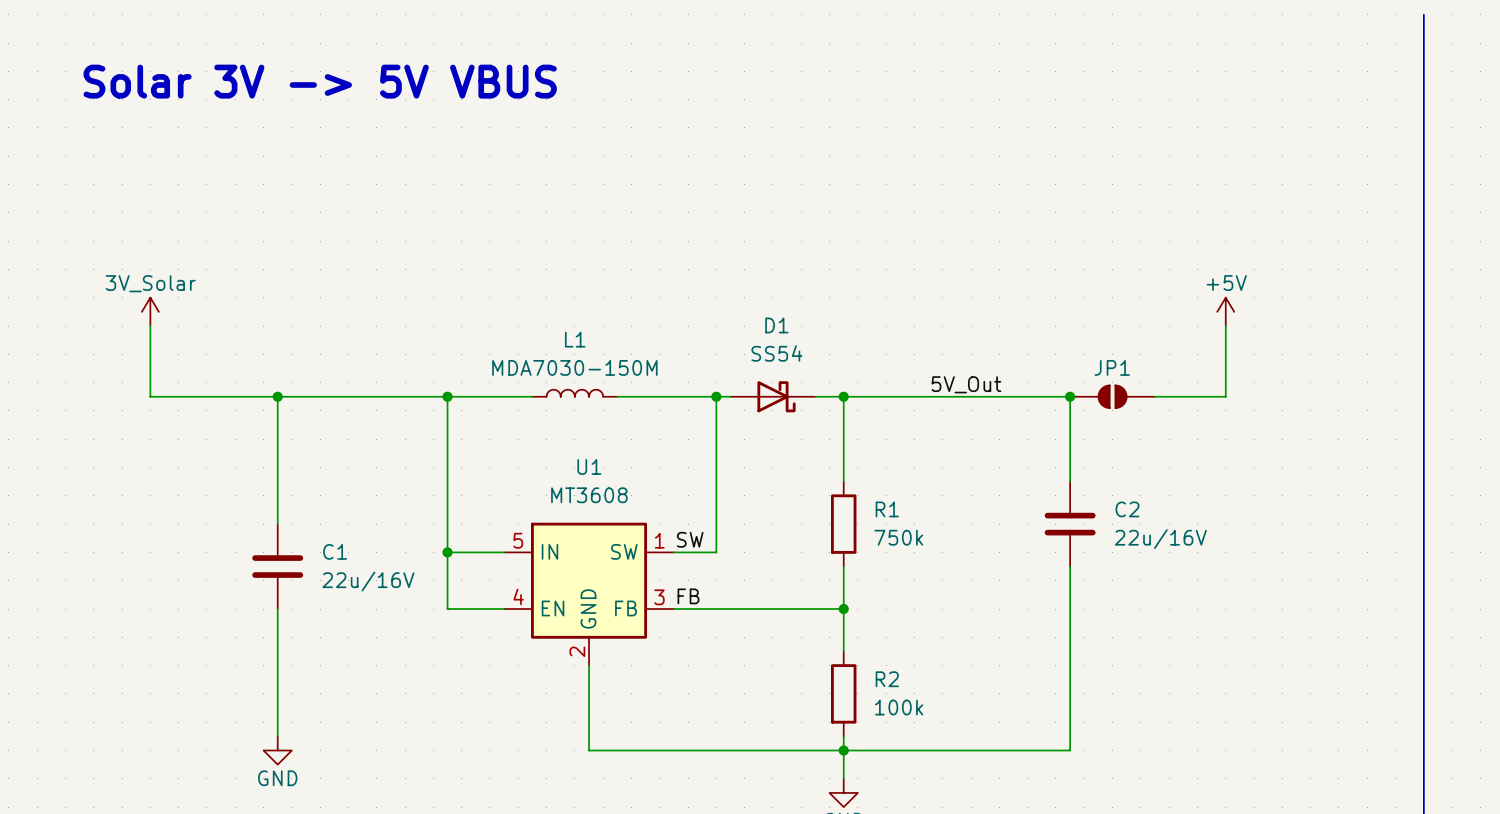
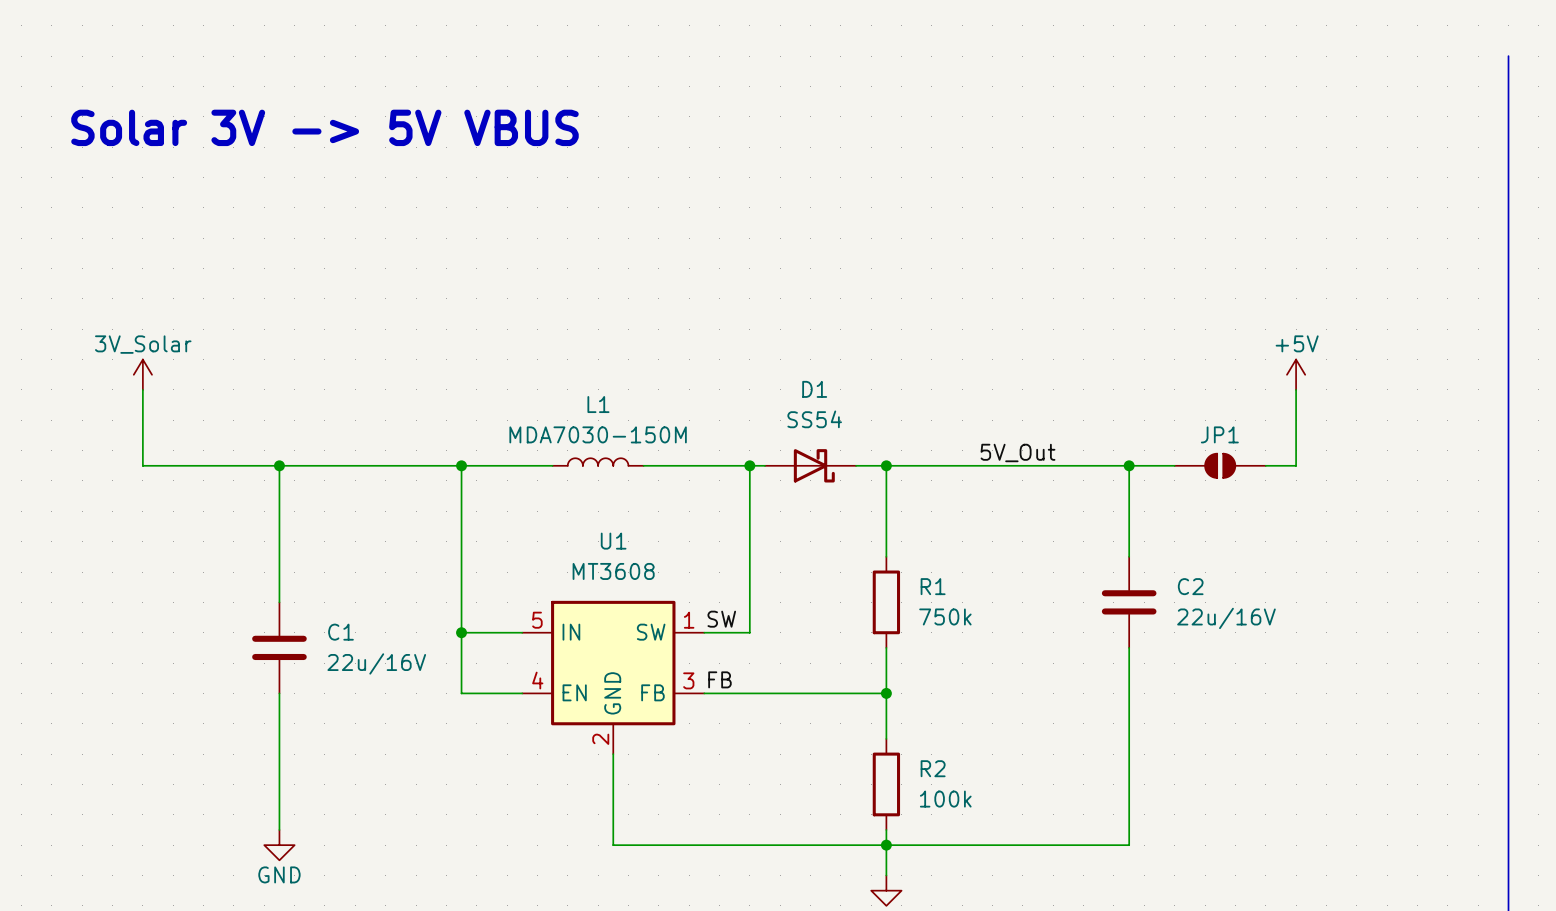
JP1 position: (1112, 396) -> (1220, 465)

